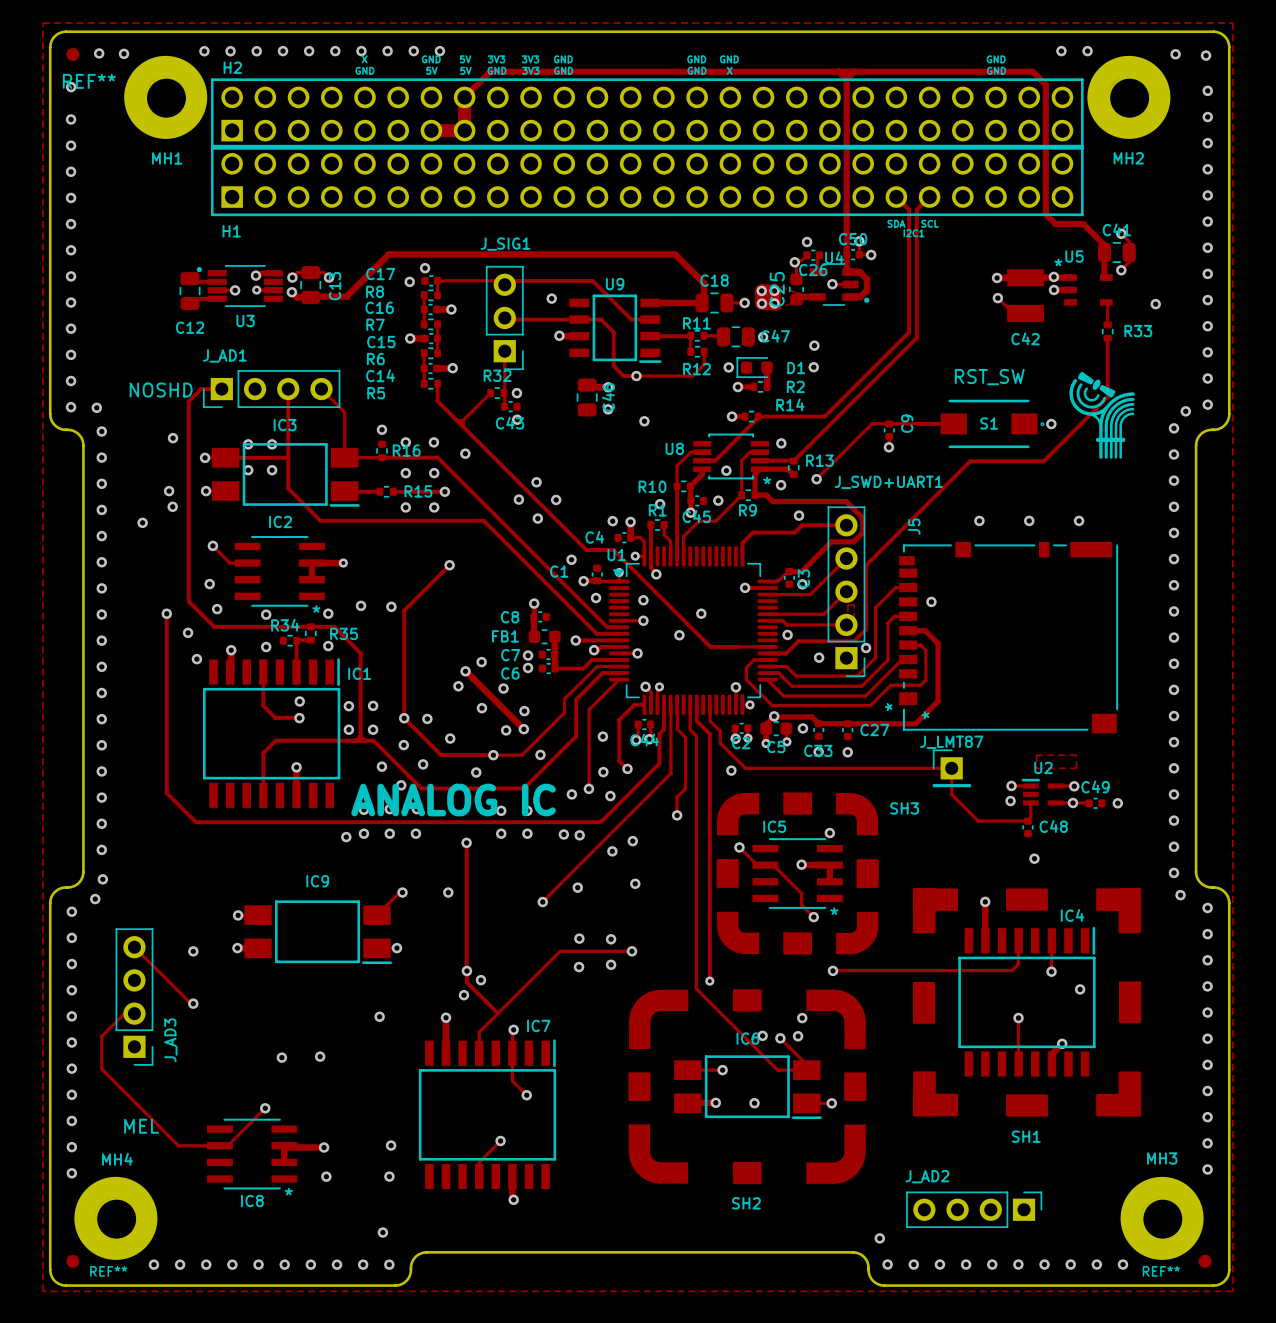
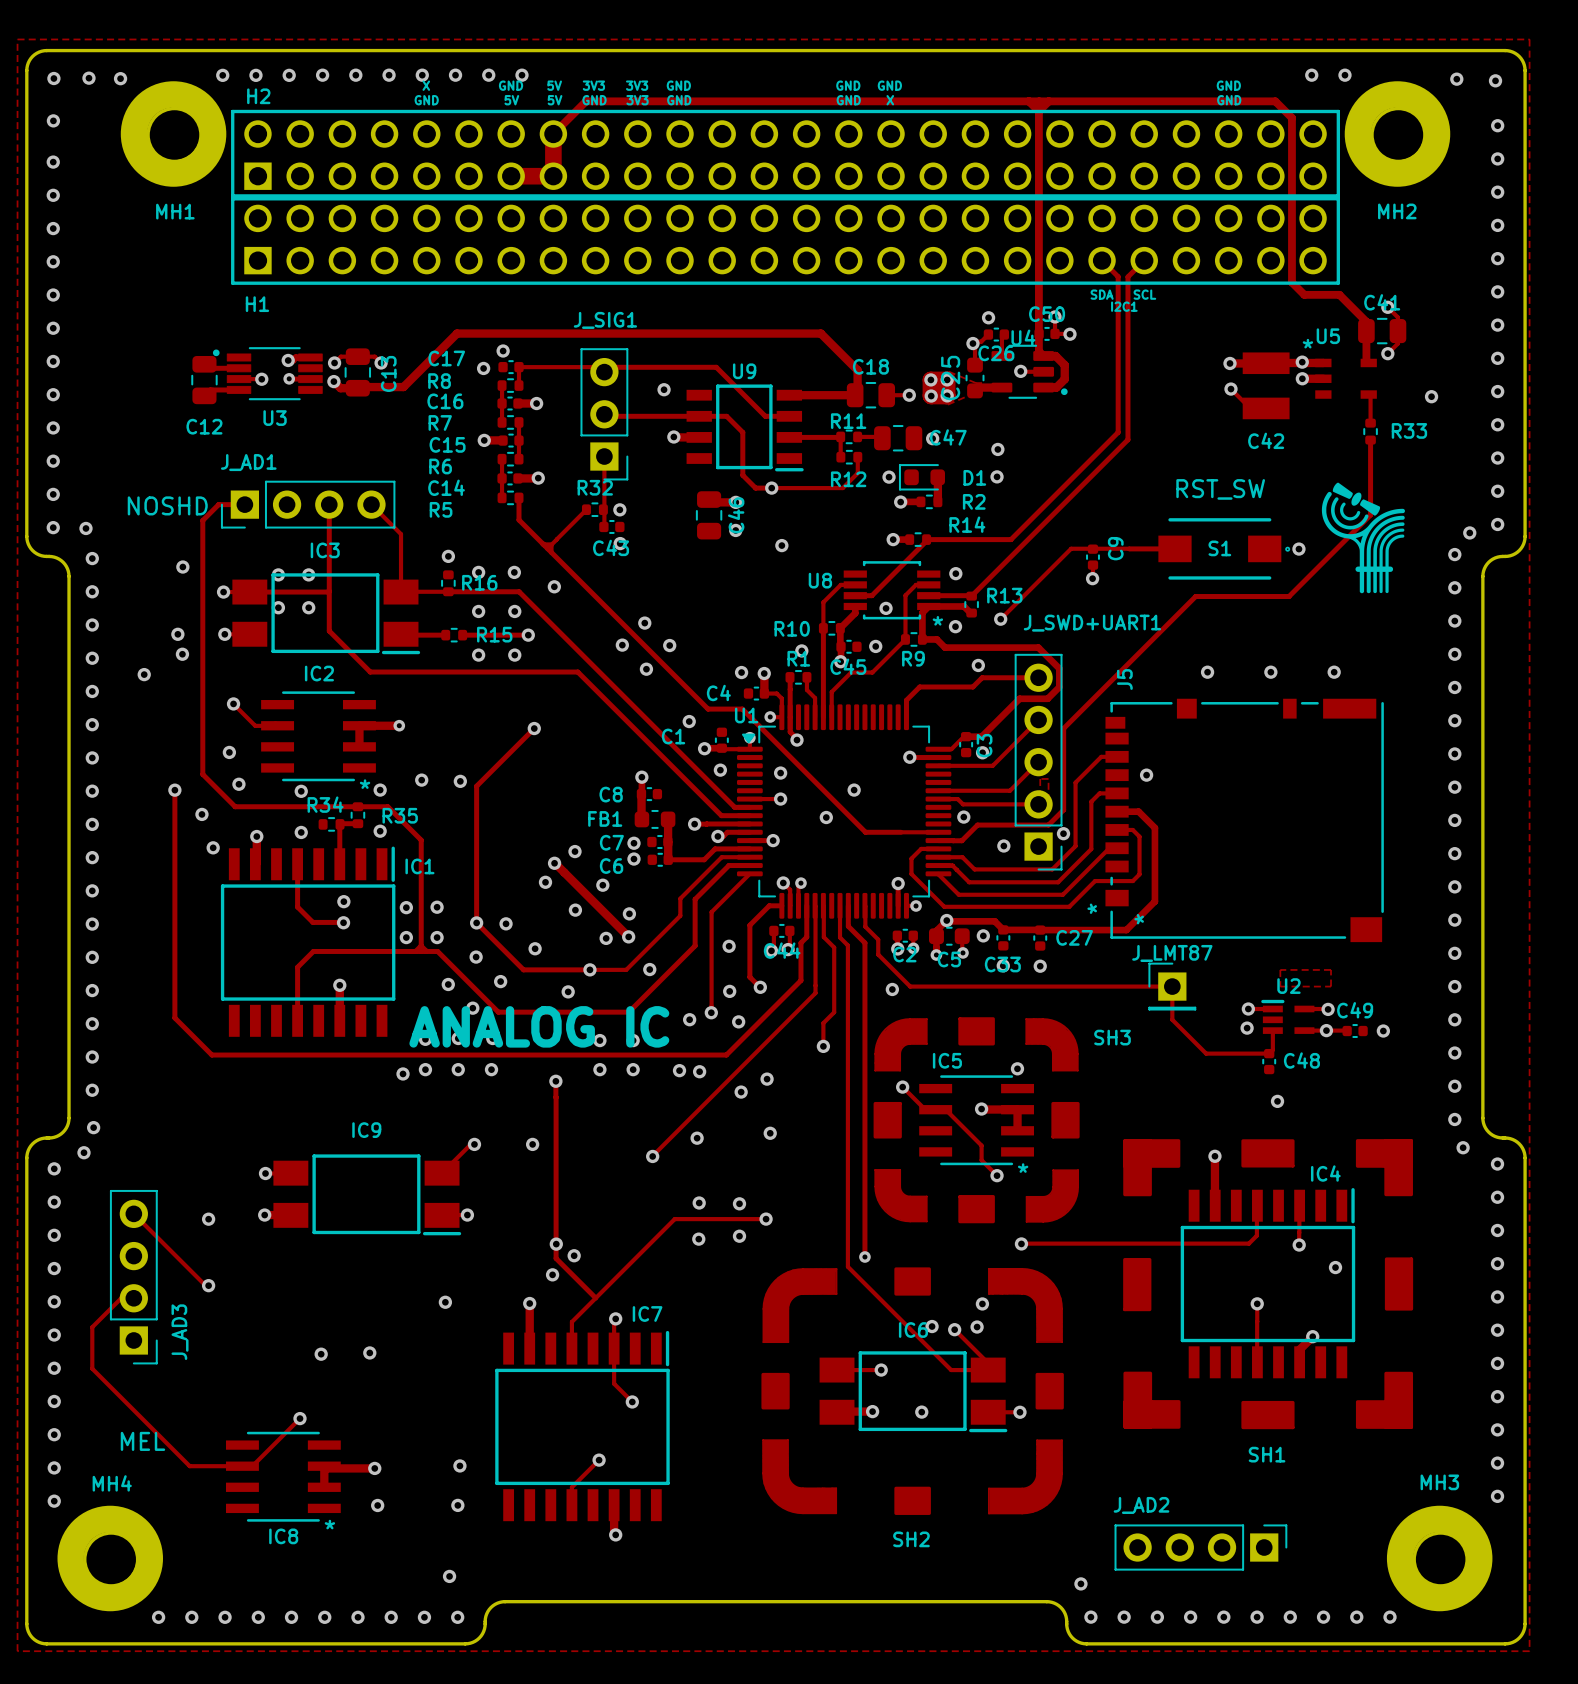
via: none -> (53, 78)
REF**: (72, 54) -> none
REF**: (72, 1261) -> none
REF**: (1205, 1261) -> none

